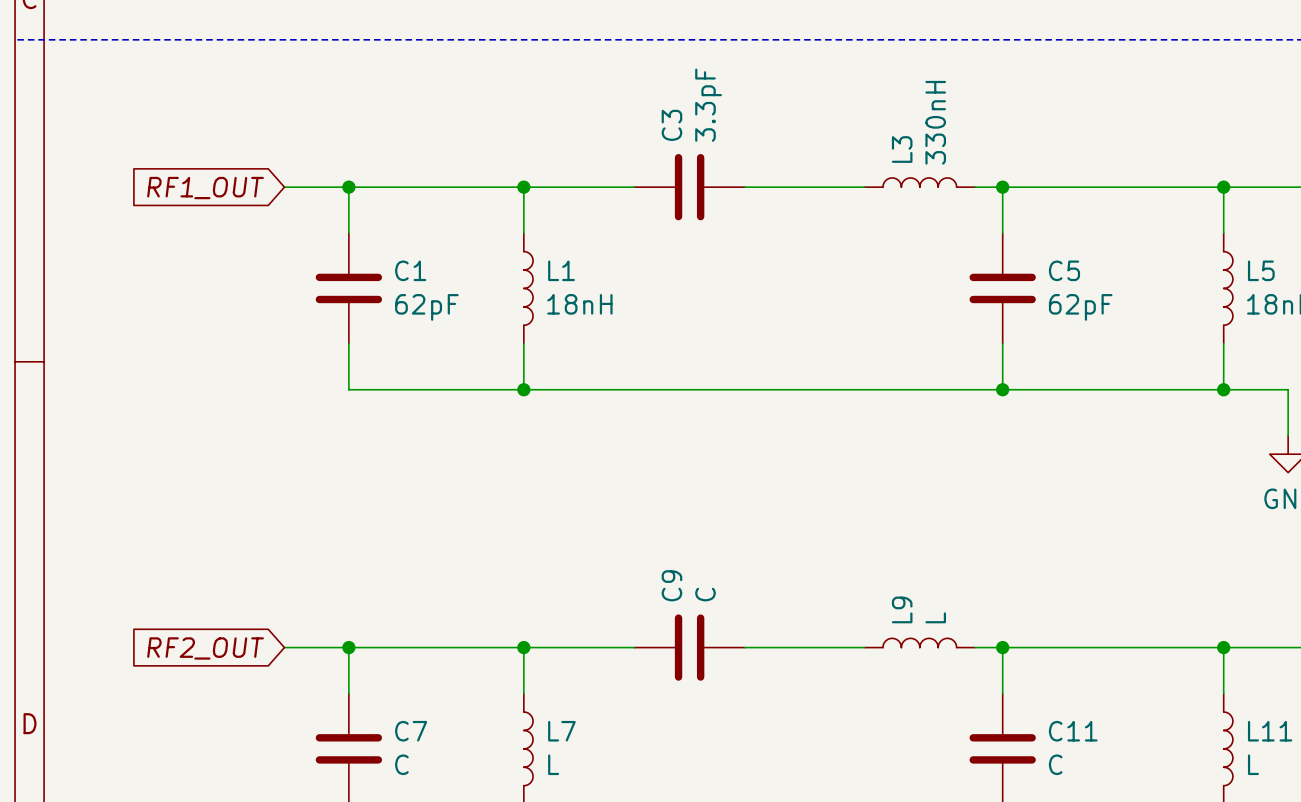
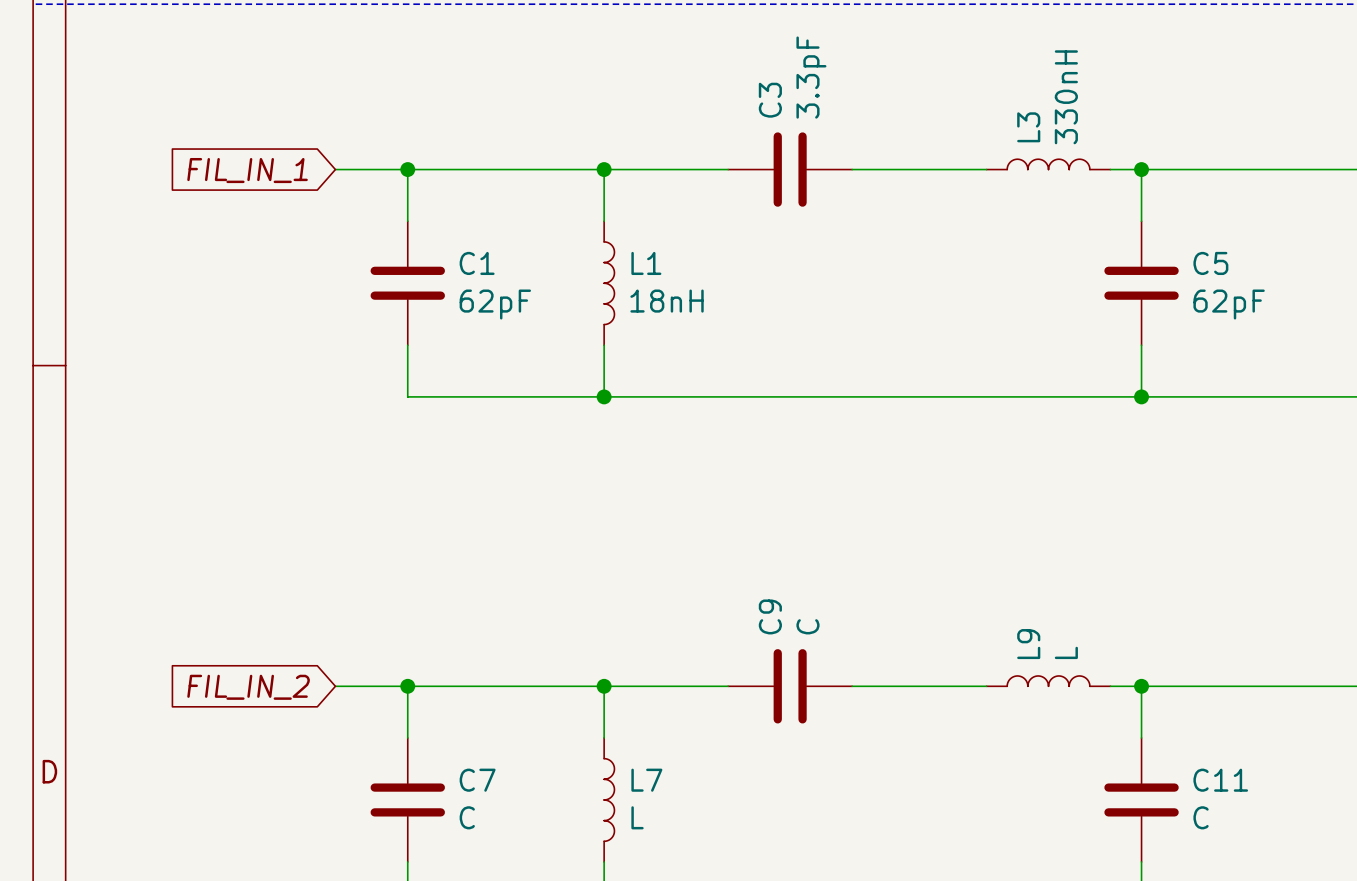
global label: RF1_OUT (205, 188) -> FIL_IN_1 (247, 170)
global label: RF2_OUT (205, 648) -> FIL_IN_2 (248, 687)

